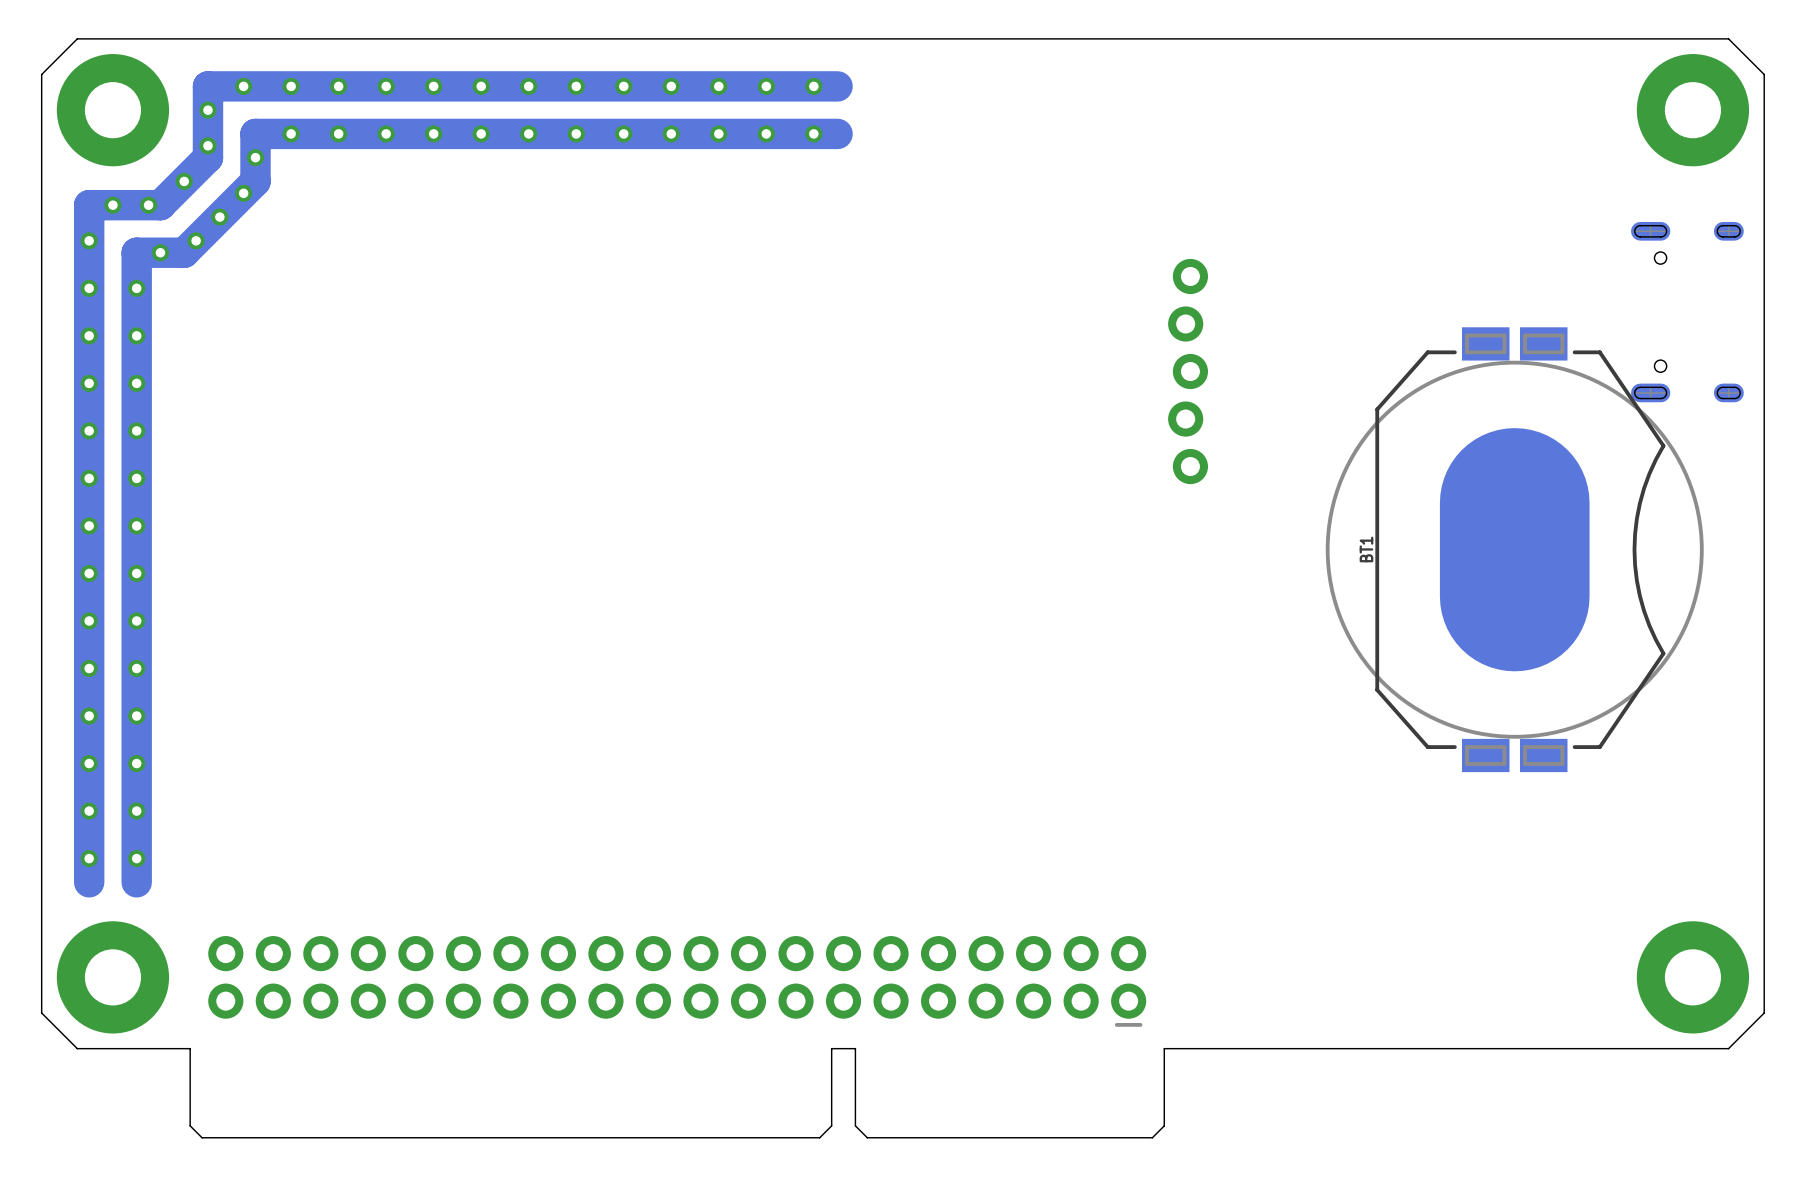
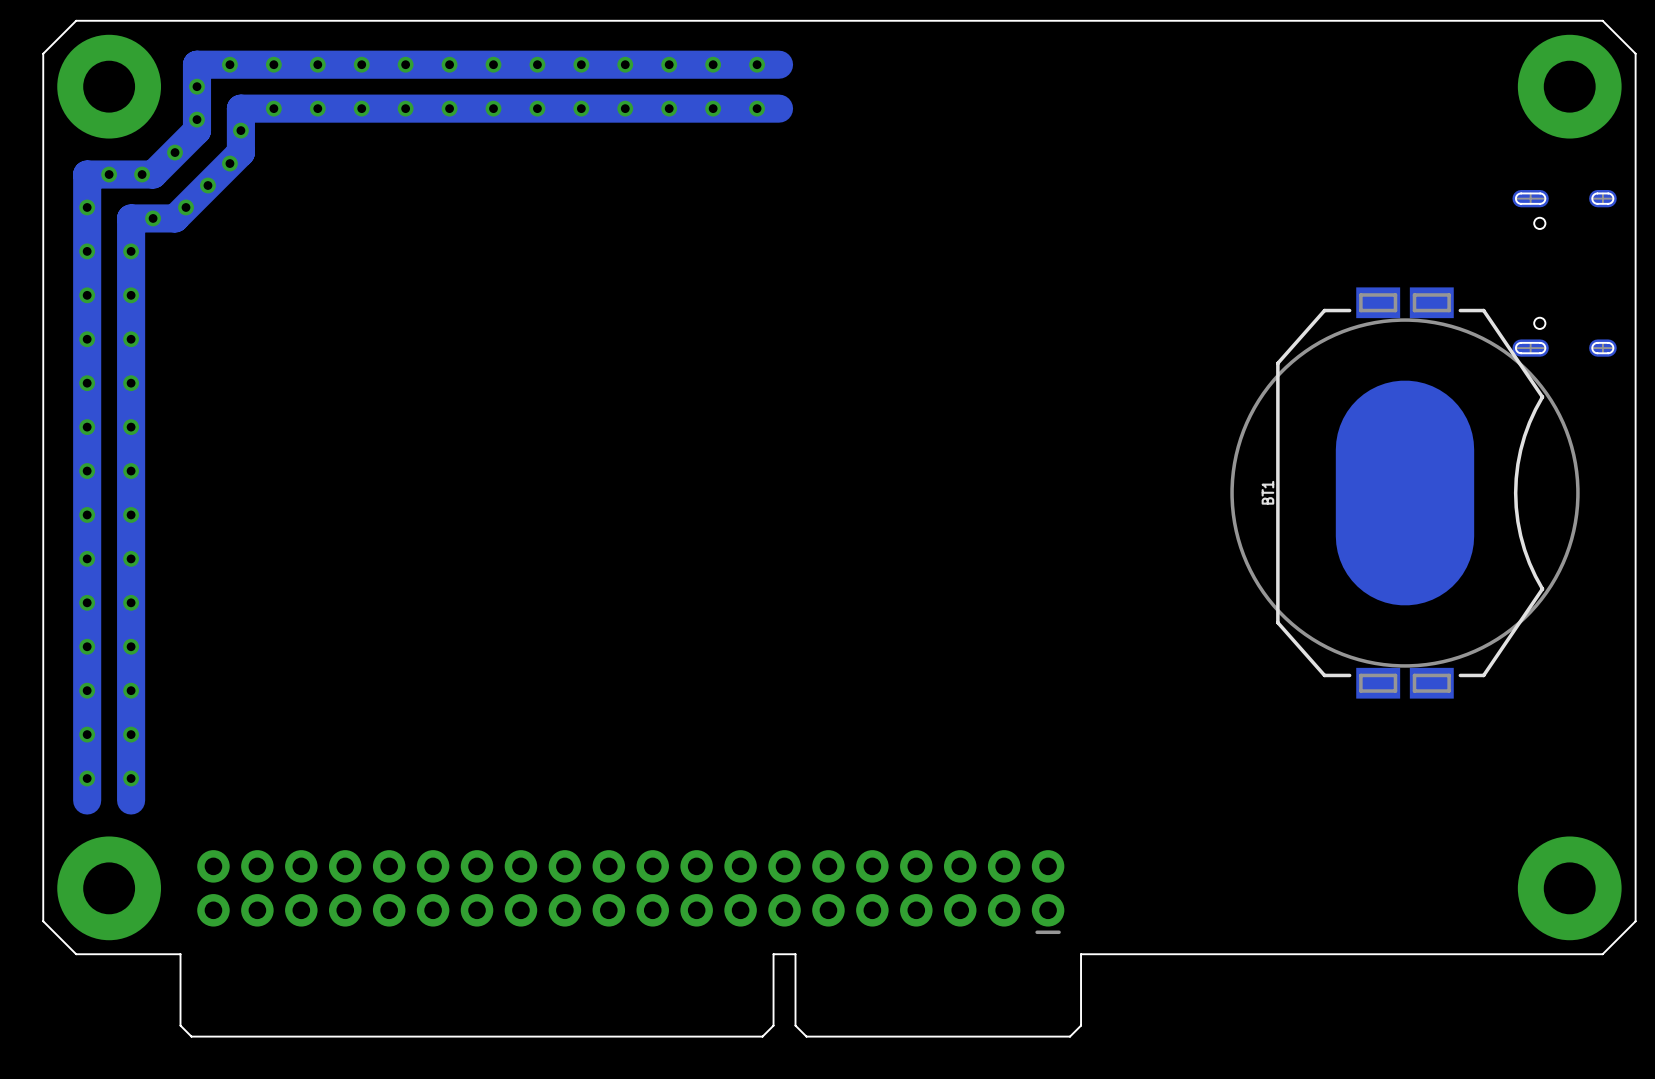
part: (1188, 371) -> none

